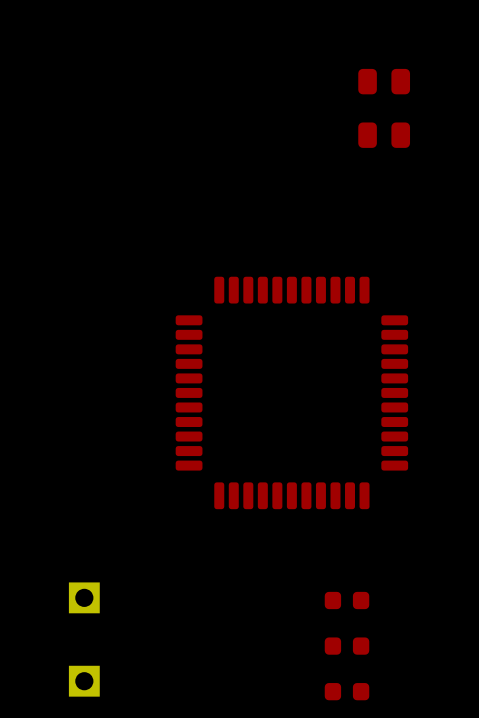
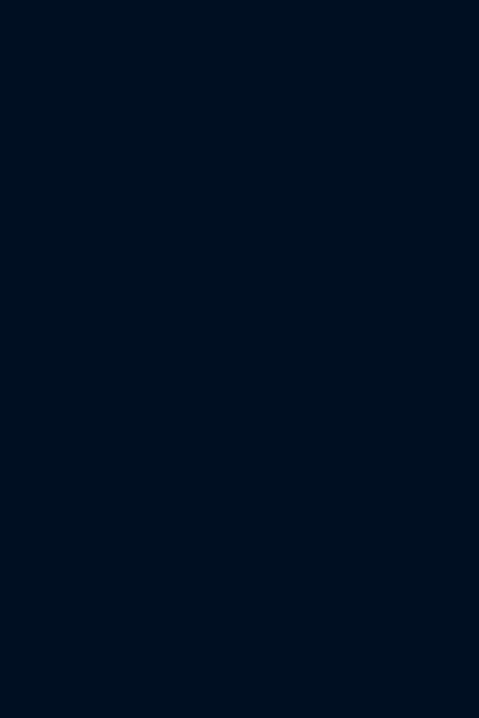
part: (384, 81) -> none
part: (384, 135) -> none
part: (291, 392) -> none
part: (84, 597) -> none
part: (347, 600) -> none
part: (347, 646) -> none
part: (84, 681) -> none
part: (347, 691) -> none

